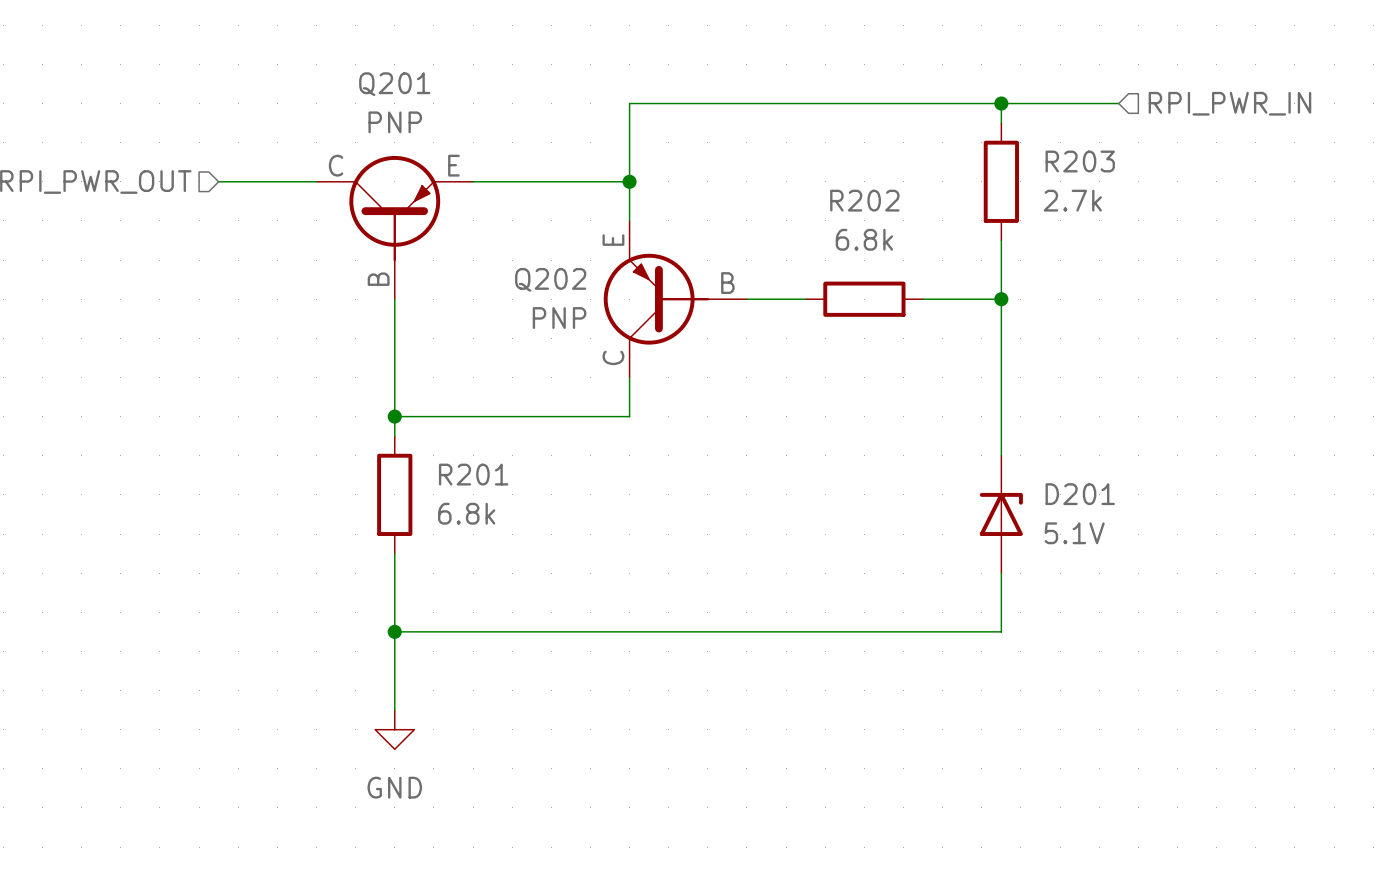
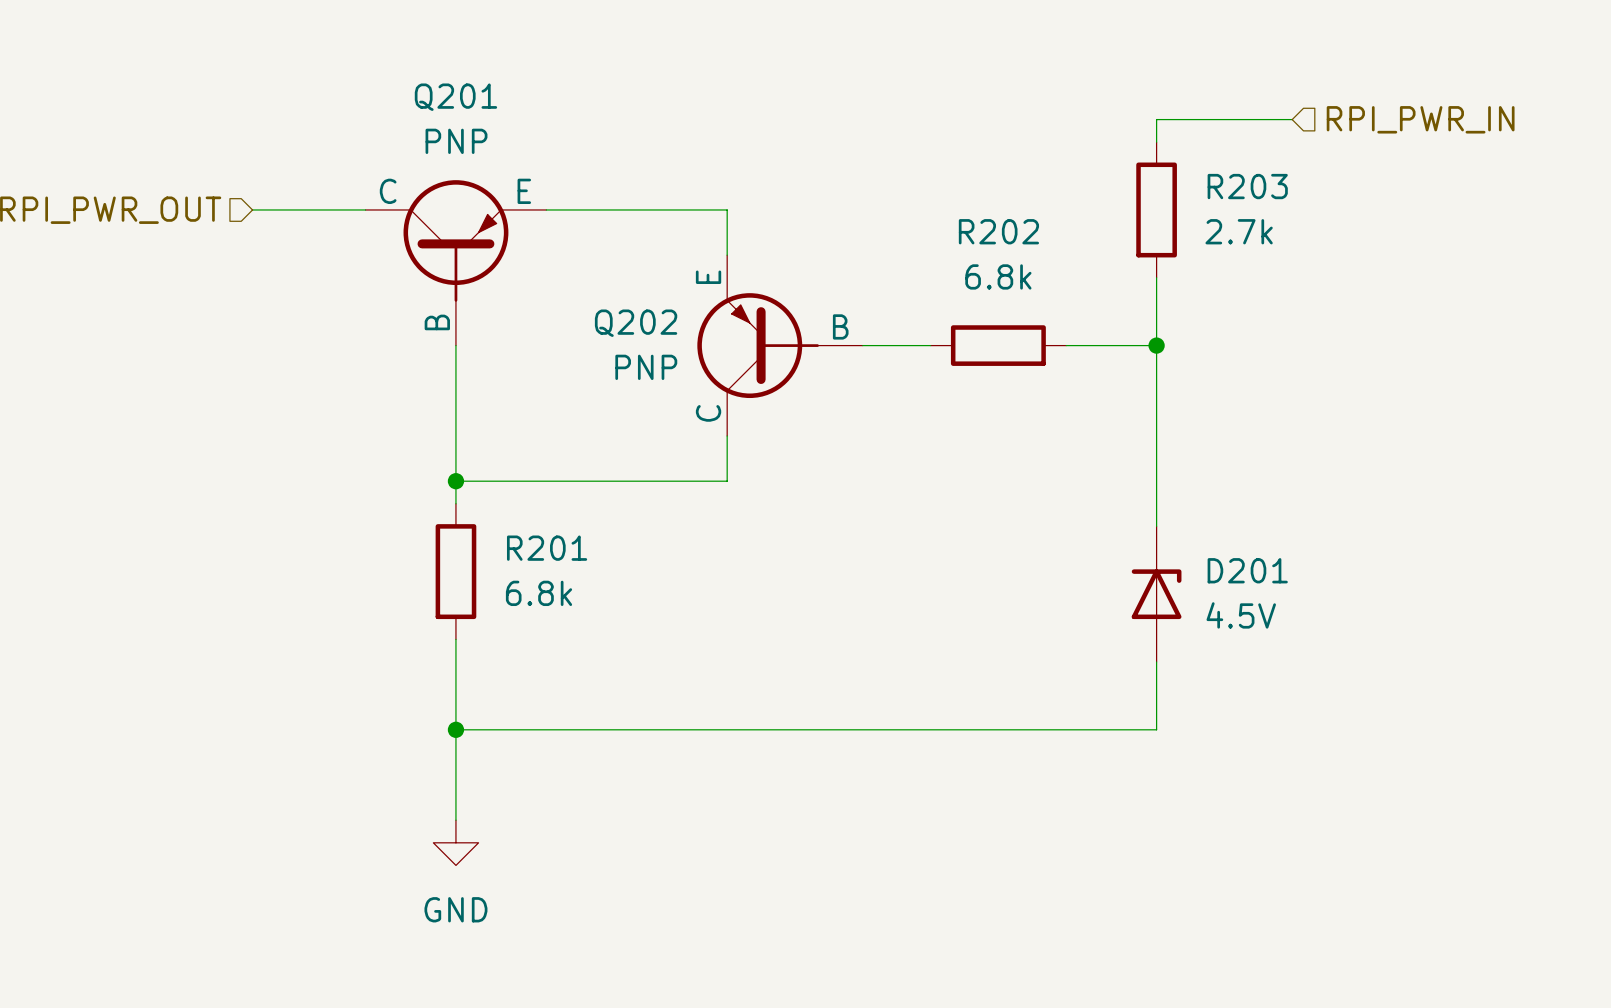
wire: (1001, 103) (629, 103) (629, 181) -> none
junction: (1001, 103) -> none
junction: (629, 181) -> none
D201 value: 5.1V (1074, 533) -> 4.5V (1241, 615)

